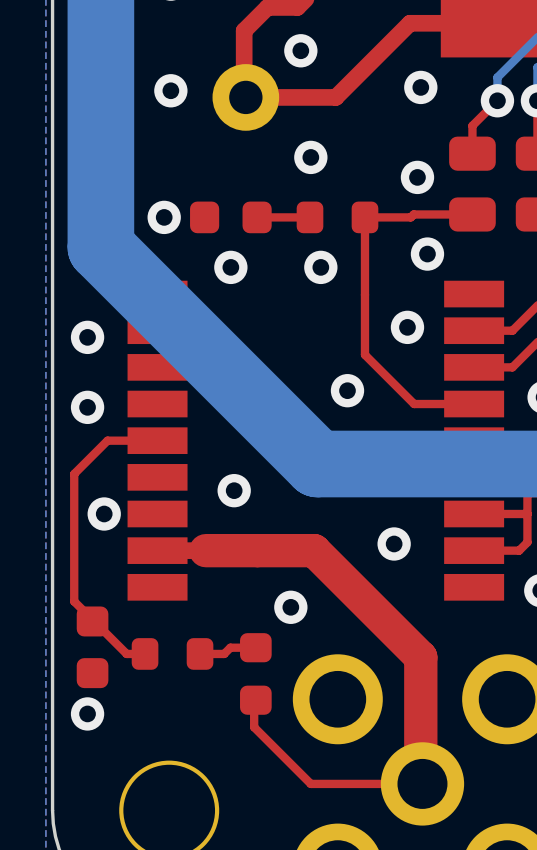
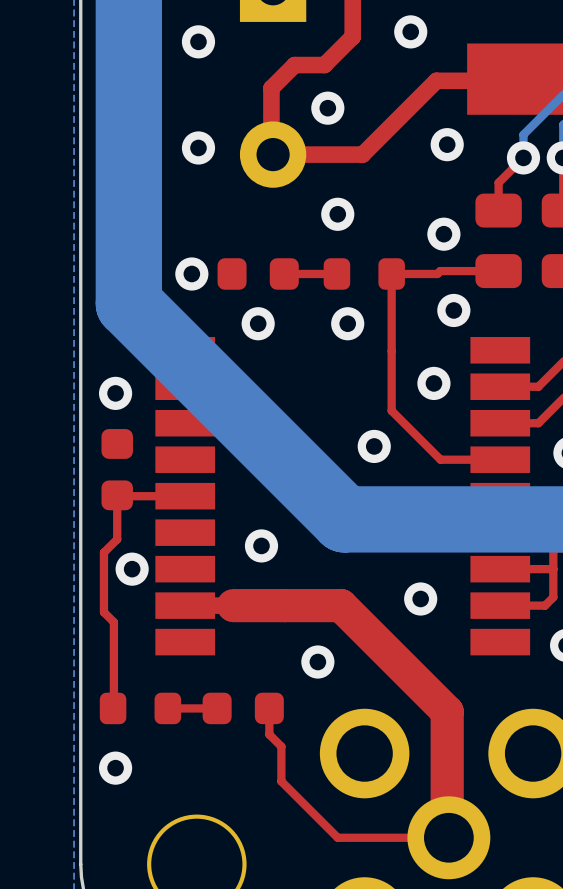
via: (87, 407) -> none
part: none -> (117, 469)
top track: (107, 440) (74, 474) (74, 601) (126, 653) (140, 653) -> (135, 496) (117, 495) (117, 539) (103, 552) (103, 612) (113, 622) (113, 708)
part footprint: [76, 606, 109, 689] -> [99, 692, 182, 725]
top track: (254, 647) (230, 647) (224, 653) (198, 653) -> none
part: (172, 653) -> none
top track: none -> (217, 708) (171, 708)
top track: none -> (269, 708) (269, 734) (281, 746) (281, 754)
part rotation: 0° (255, 673) -> 90° clockwise (243, 708)

